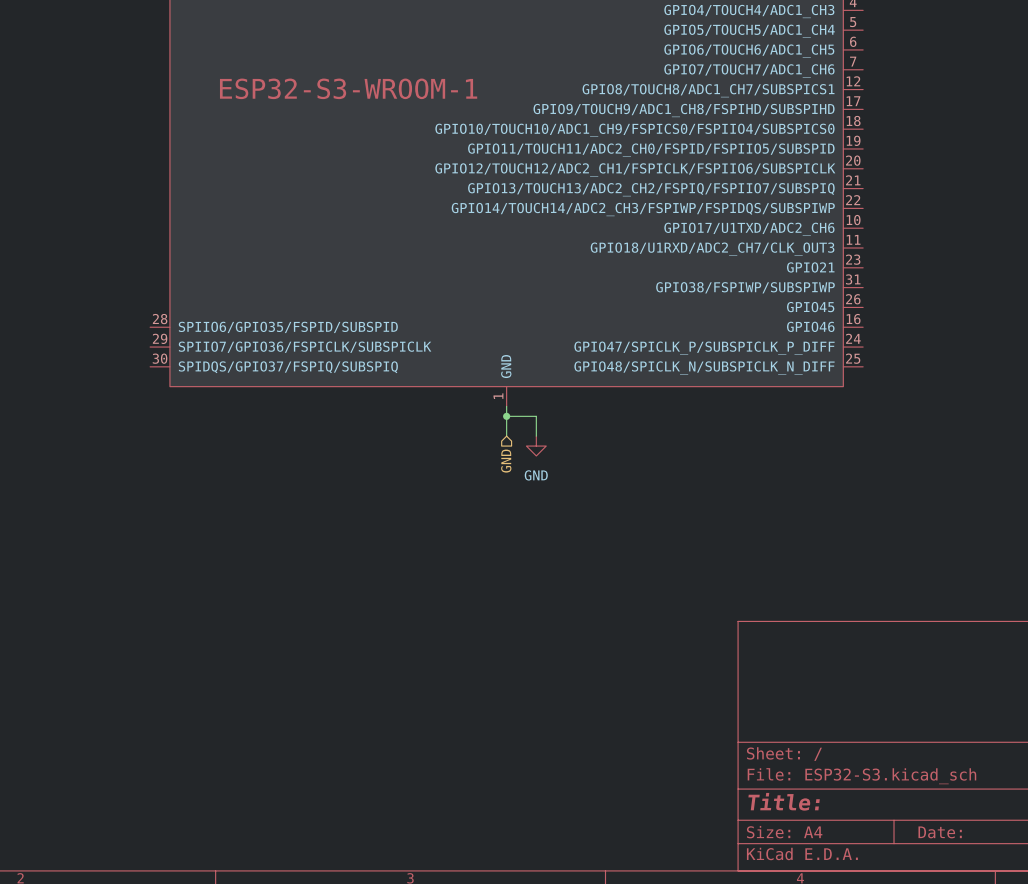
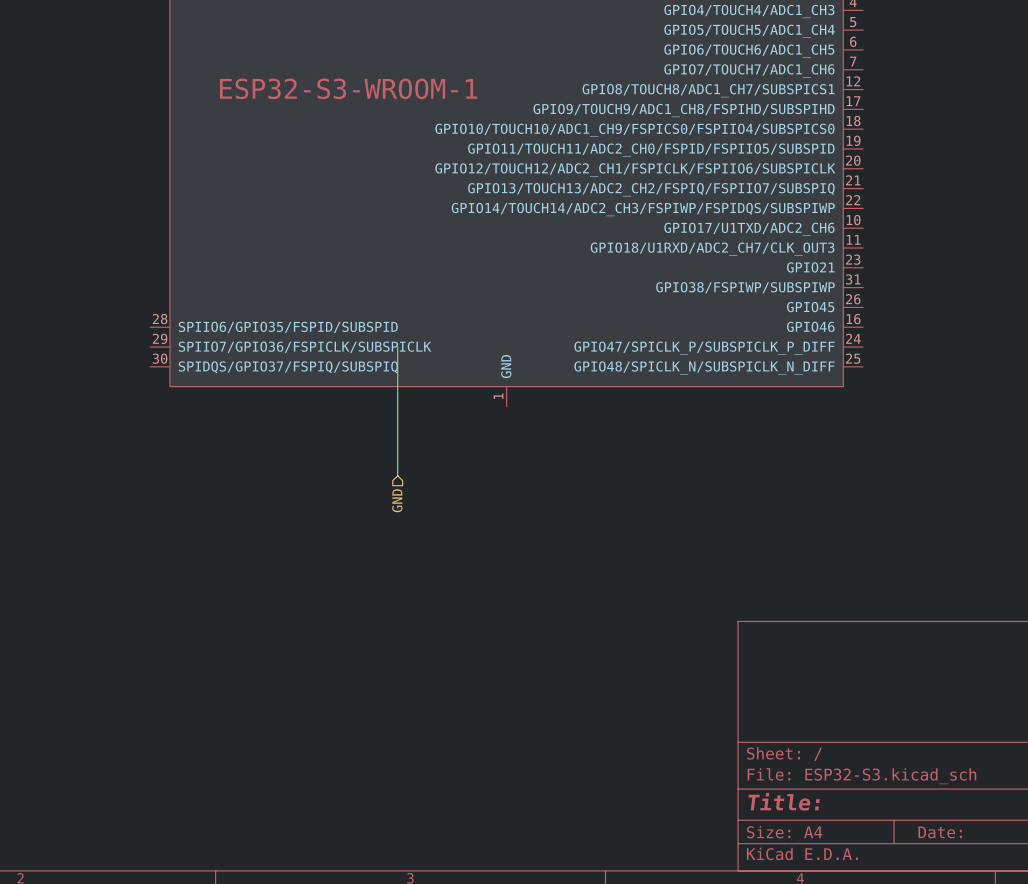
wire: none -> (397, 347) (397, 475)
wire: (506, 406) (506, 436) -> none
wire: (506, 416) (536, 416) (536, 436) -> none
junction: (506, 416) -> none
power symbol: GND (536, 446) -> none
hierarchical label position: GND (506, 461) -> GND (397, 500)

